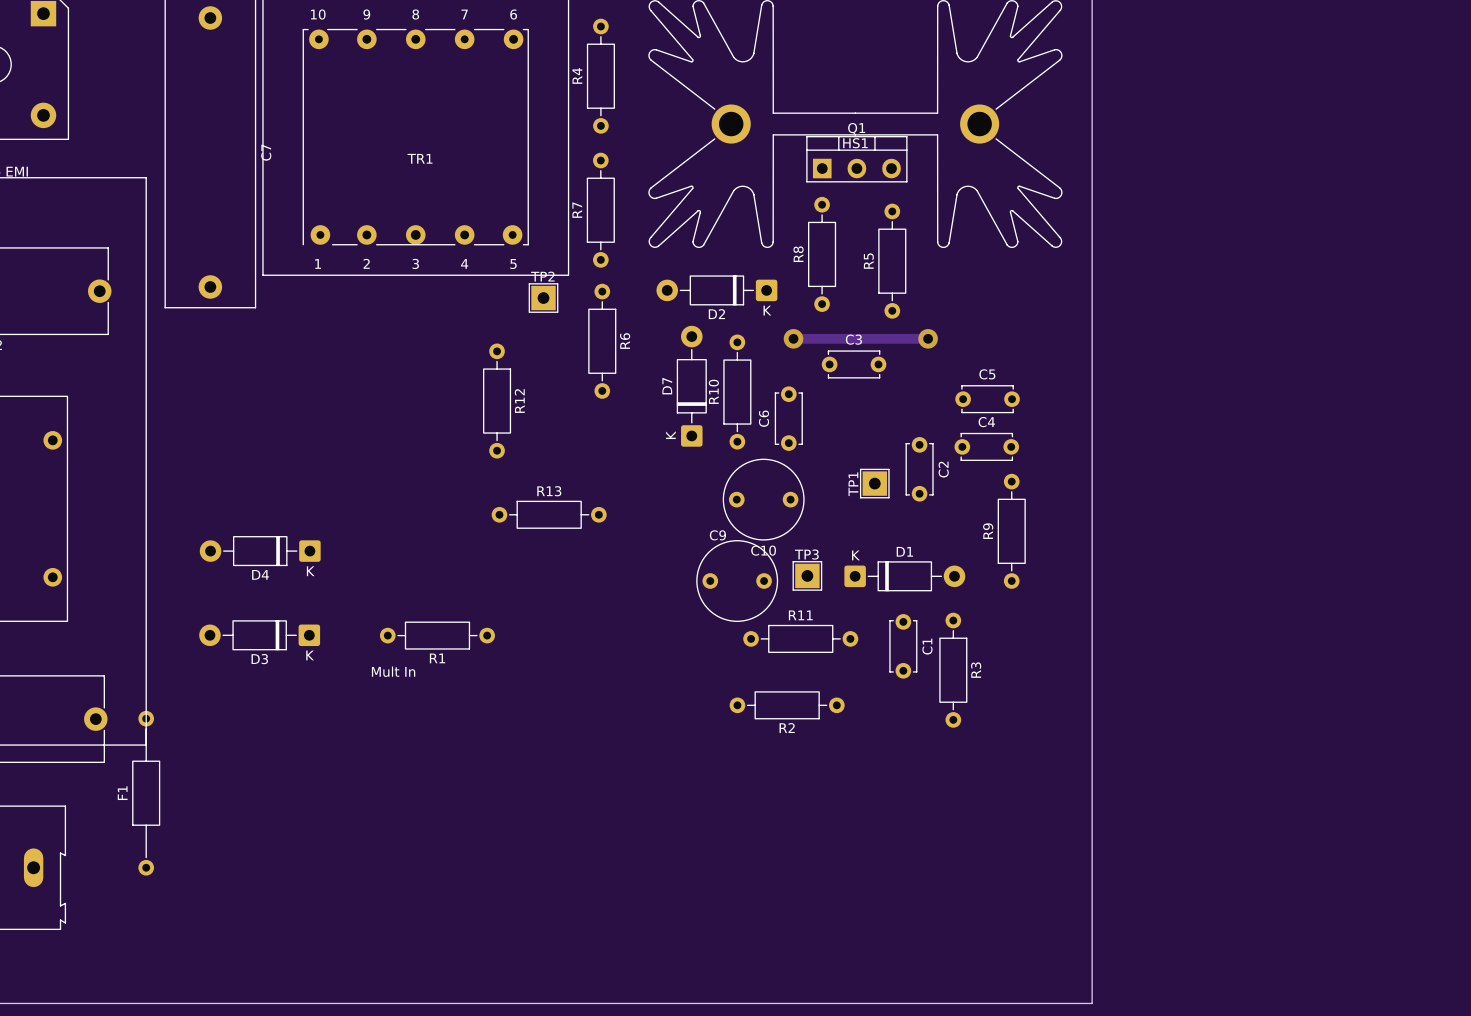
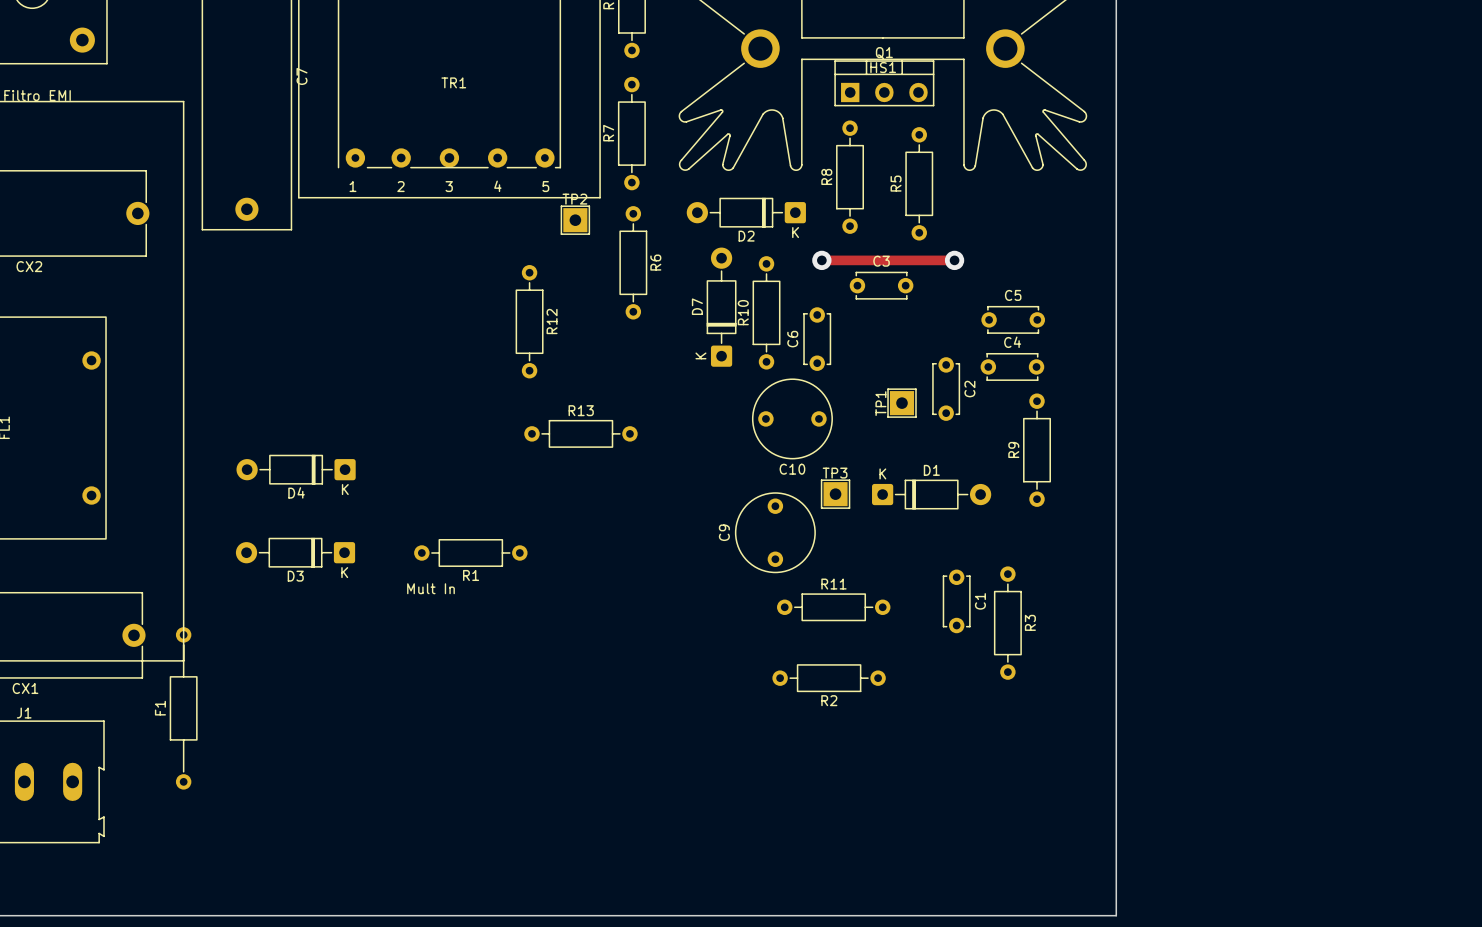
C9 name position: C9 (717, 535) -> C9 (724, 532)
C9 rotation: 0° (737, 581) -> 90° clockwise (775, 532)
R11 position: (800, 638) -> (833, 607)
C1 position: (903, 646) -> (956, 601)
R3 position: (953, 670) -> (1007, 623)
R2 position: (787, 705) -> (829, 678)

